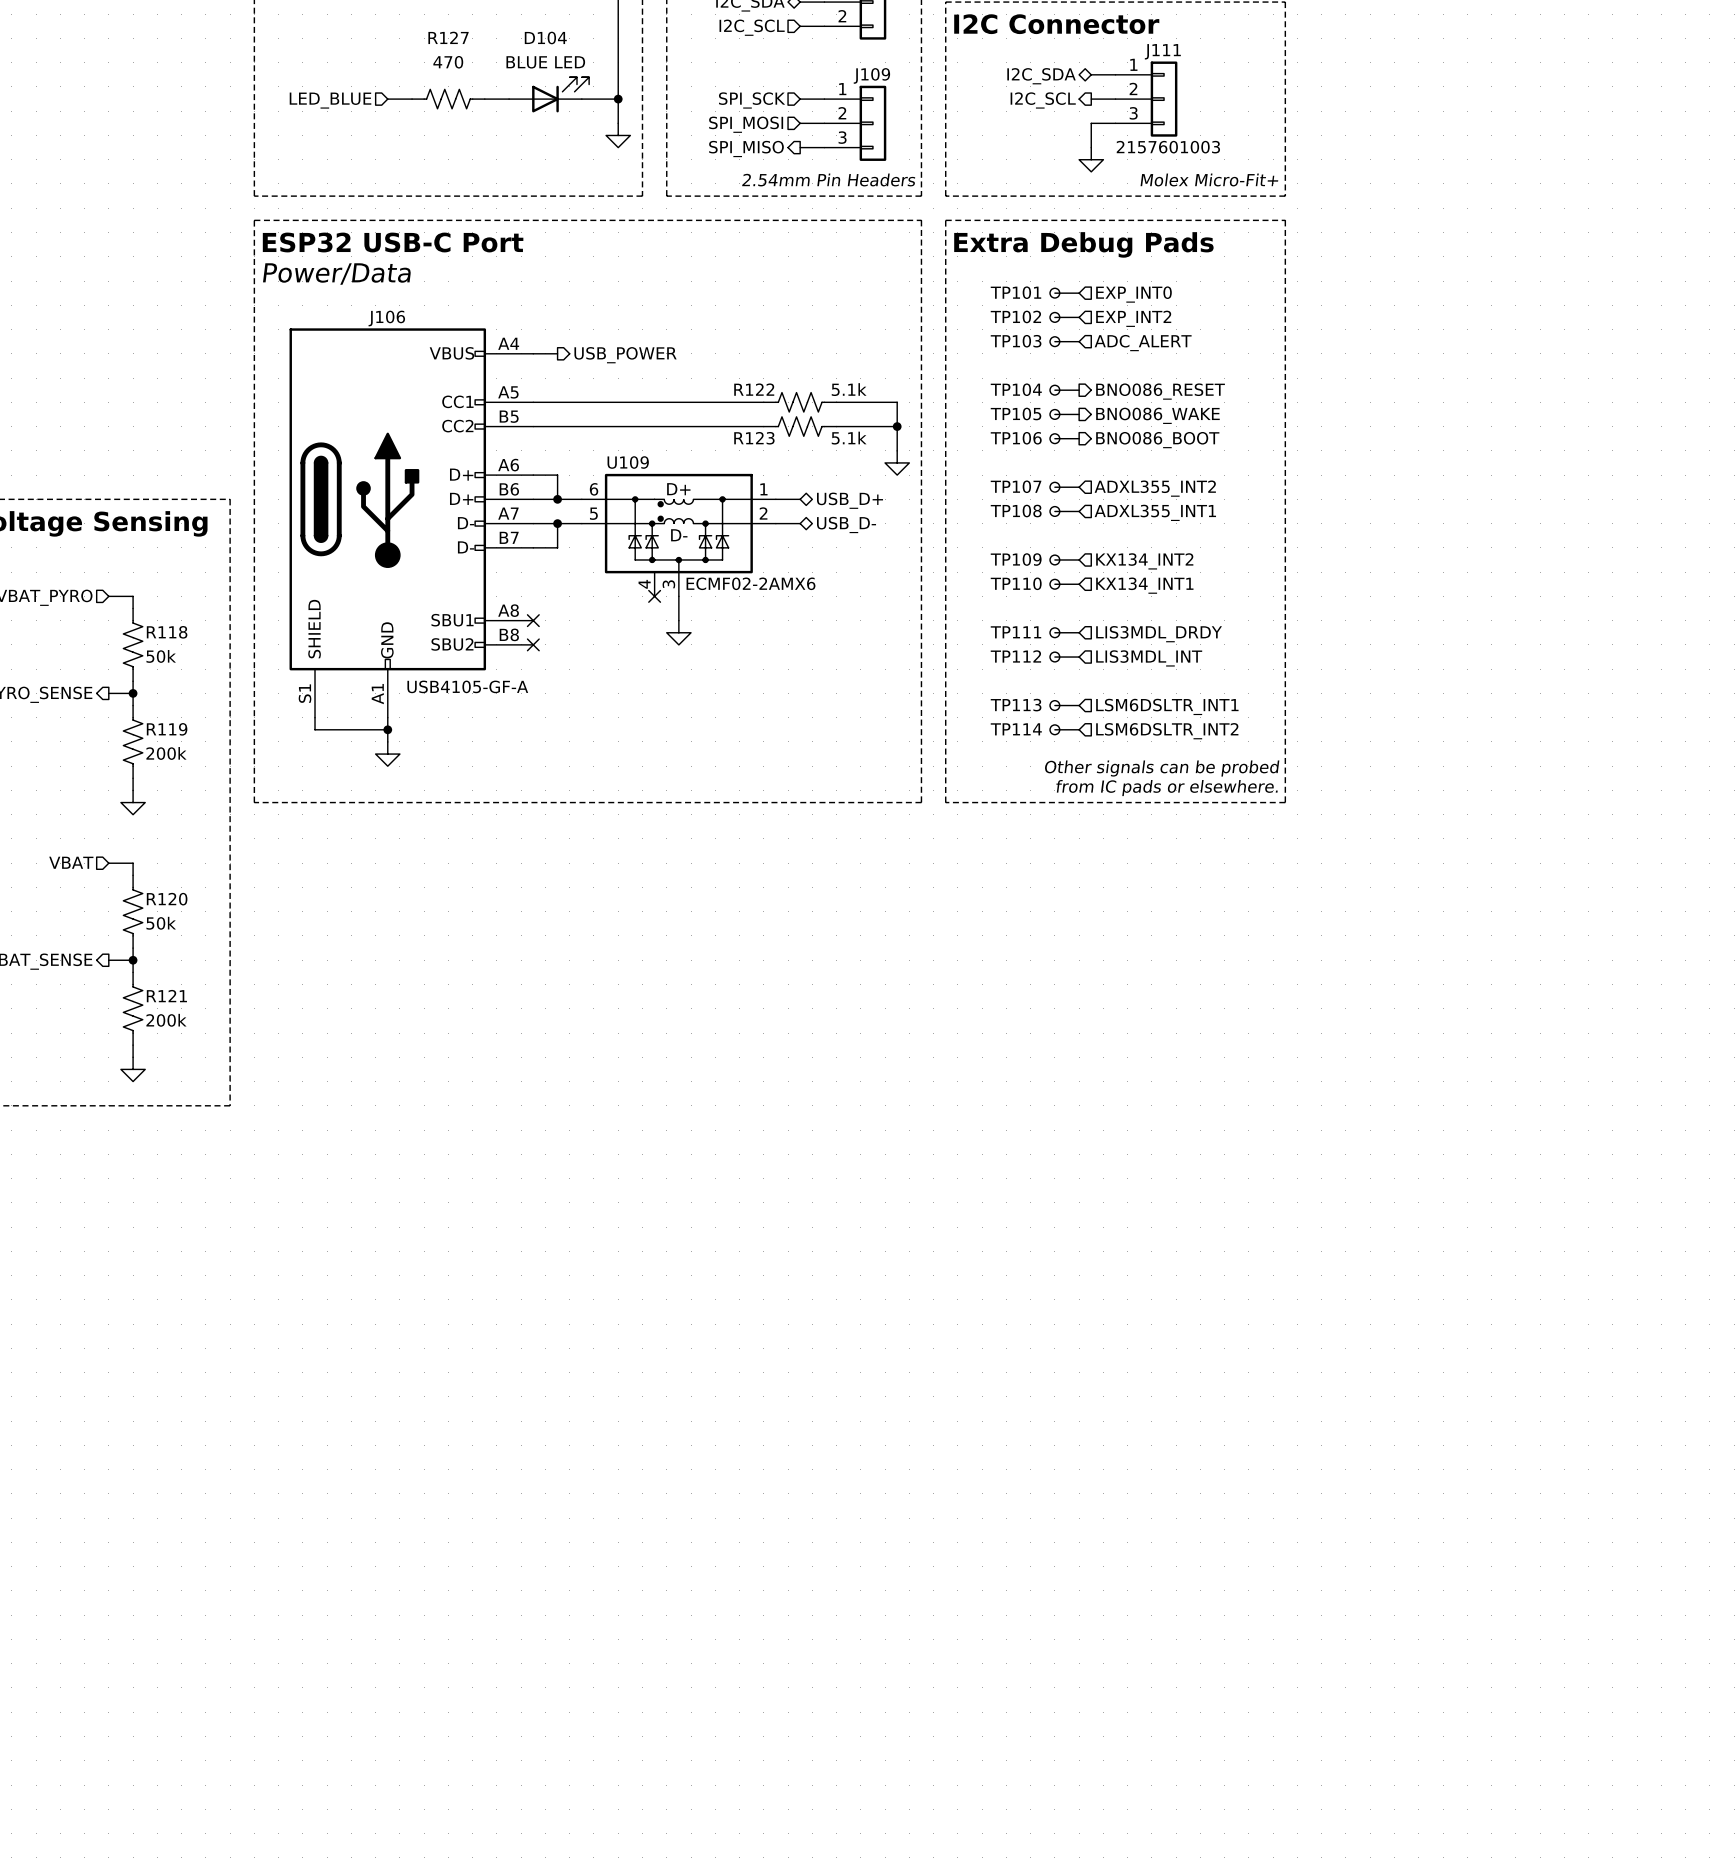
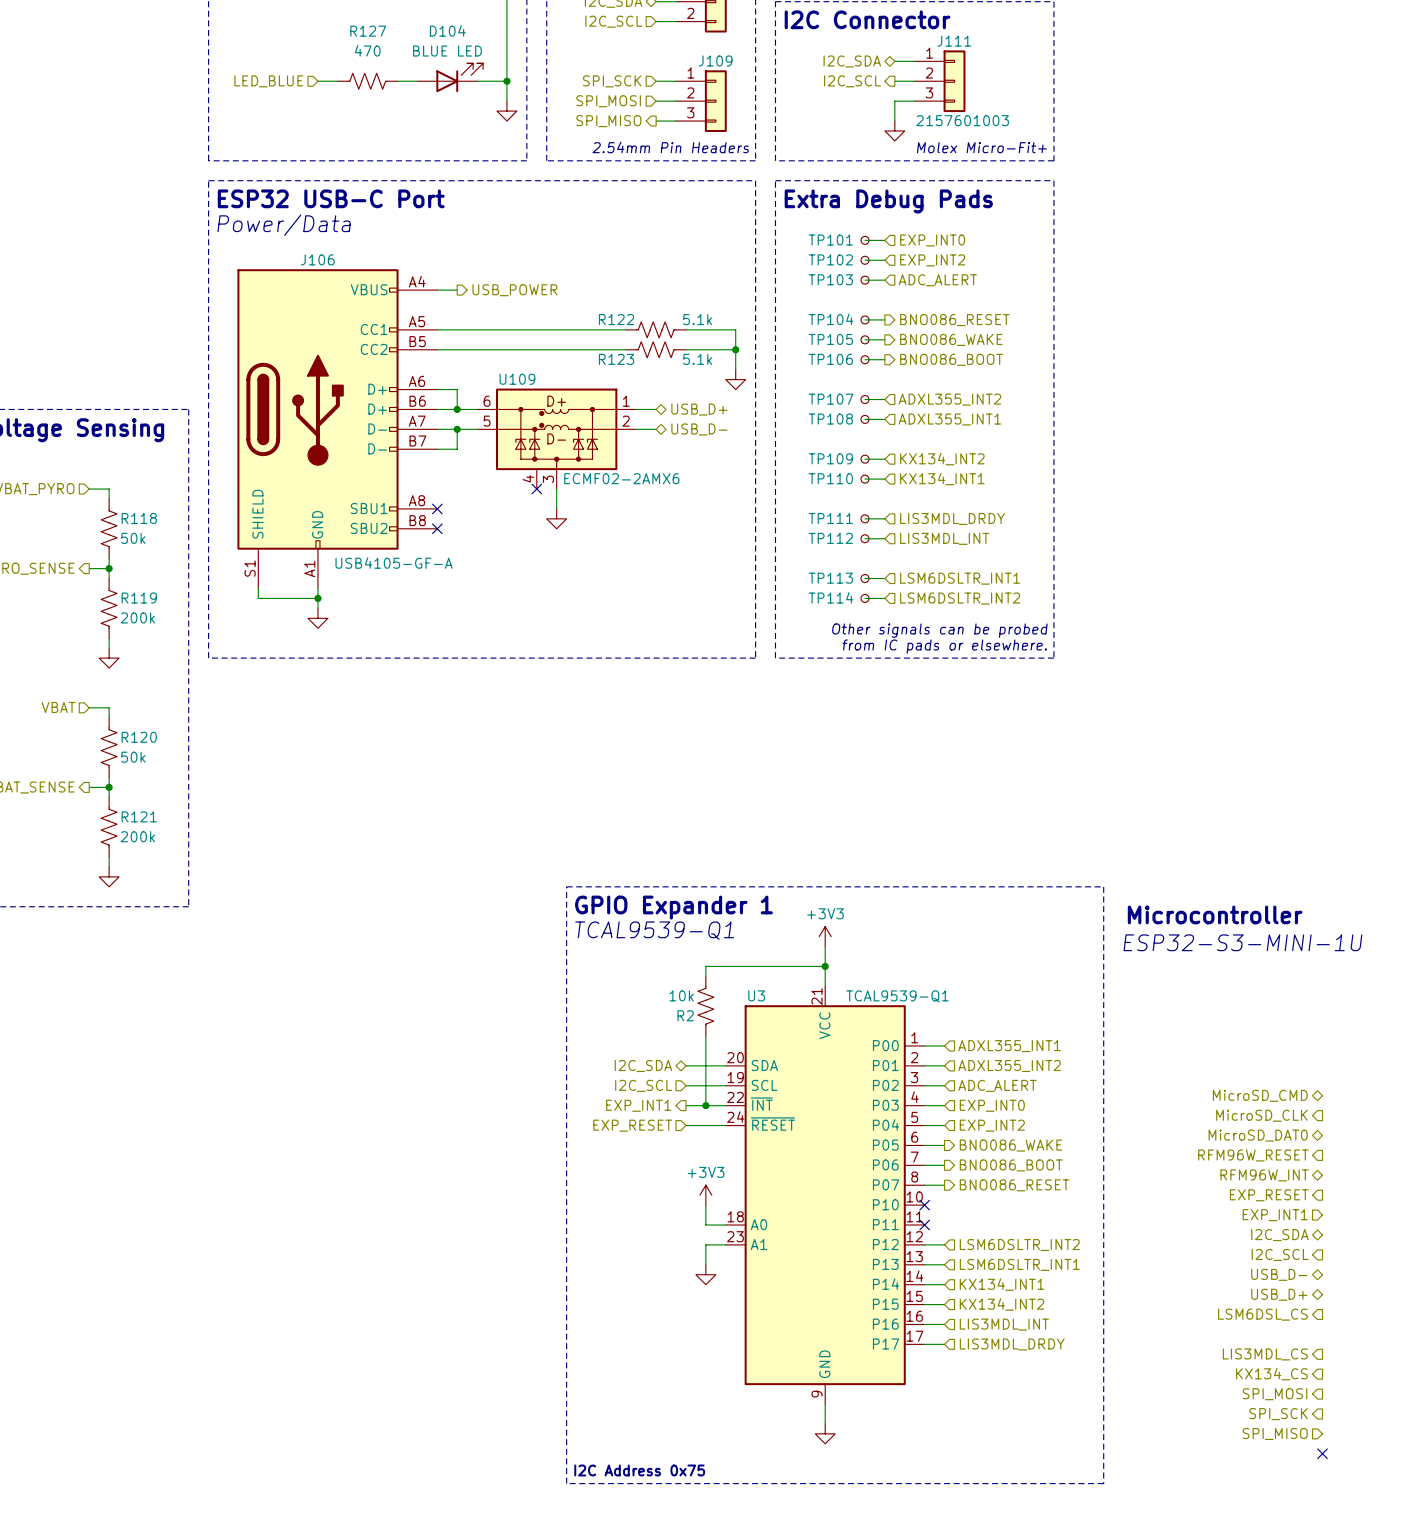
line: none -> (566, 886) (1103, 886) (1103, 1483) (566, 1483) (566, 886)
text: none -> GPIO Expander 1 (673, 907)
text: none -> Microcontroller (1215, 914)
text: none -> TCAL9539-Q1 (654, 930)
power symbol: none -> +3V3 (825, 936)
text: none -> ESP32-S3-MINI-1U (1242, 942)
wire: none -> (825, 946) (825, 986)
wire: none -> (825, 966) (705, 966) (705, 976)
junction: none -> (825, 966)
R2: none -> 10k (705, 1006)
wire: none -> (705, 1036) (705, 1105)
wire: none -> (924, 1045) (944, 1045)
hierarchical label: none -> ADXL355_INT1 (1009, 1046)
wire: none -> (685, 1065) (725, 1065)
wire: none -> (924, 1065) (944, 1065)
hierarchical label: none -> I2C_SDA (643, 1065)
hierarchical label: none -> ADXL355_INT2 (1009, 1065)
wire: none -> (685, 1085) (725, 1085)
wire: none -> (924, 1085) (944, 1085)
hierarchical label: none -> I2C_SCL (643, 1085)
hierarchical label: none -> ADC_ALERT (997, 1085)
hierarchical label: none -> MicroSD_CMD (1260, 1095)
wire: none -> (685, 1105) (725, 1105)
junction: none -> (705, 1105)
wire: none -> (924, 1105) (944, 1105)
hierarchical label: none -> EXP_INT1 (638, 1105)
hierarchical label: none -> EXP_INT0 (992, 1105)
hierarchical label: none -> MicroSD_CLK (1261, 1115)
wire: none -> (685, 1125) (725, 1125)
wire: none -> (924, 1125) (944, 1125)
hierarchical label: none -> EXP_RESET (632, 1125)
hierarchical label: none -> EXP_INT2 (992, 1125)
hierarchical label: none -> MicroSD_DAT0 (1258, 1135)
wire: none -> (924, 1145) (944, 1145)
hierarchical label: none -> BNO086_WAKE (1011, 1145)
hierarchical label: none -> RFM96W_RESET (1253, 1155)
wire: none -> (924, 1165) (944, 1165)
hierarchical label: none -> BNO086_BOOT (1011, 1165)
hierarchical label: none -> RFM96W_INT (1264, 1175)
wire: none -> (924, 1185) (944, 1185)
hierarchical label: none -> BNO086_RESET (1014, 1185)
power symbol: none -> +3V3 (705, 1195)
U3: none -> TCAL9539-Q1 (825, 1195)
hierarchical label: none -> EXP_RESET (1269, 1195)
wire: none -> (705, 1205) (705, 1225) (725, 1225)
no-connect mark: none -> (924, 1205)
hierarchical label: none -> EXP_INT1 (1275, 1215)
no-connect mark: none -> (924, 1225)
hierarchical label: none -> I2C_SDA (1279, 1235)
wire: none -> (725, 1244) (705, 1244) (705, 1264)
wire: none -> (924, 1244) (944, 1244)
hierarchical label: none -> LSM6DSLTR_INT2 (1019, 1245)
hierarchical label: none -> I2C_SCL (1280, 1254)
wire: none -> (924, 1264) (944, 1264)
hierarchical label: none -> LSM6DSLTR_INT1 (1019, 1264)
power symbol: none -> (705, 1274)
hierarchical label: none -> USB_D- (1279, 1274)
wire: none -> (924, 1284) (944, 1284)
hierarchical label: none -> KX134_INT1 (1002, 1284)
hierarchical label: none -> USB_D+ (1279, 1294)
wire: none -> (924, 1304) (944, 1304)
hierarchical label: none -> KX134_INT2 (1002, 1304)
hierarchical label: none -> LSM6DSL_CS (1262, 1314)
wire: none -> (924, 1324) (944, 1324)
hierarchical label: none -> LIS3MDL_INT (1004, 1324)
wire: none -> (924, 1344) (944, 1344)
hierarchical label: none -> LIS3MDL_DRDY (1012, 1344)
hierarchical label: none -> LIS3MDL_CS (1265, 1354)
hierarchical label: none -> KX134_CS (1271, 1374)
hierarchical label: none -> SPI_MOSI (1274, 1394)
wire: none -> (825, 1404) (825, 1423)
hierarchical label: none -> SPI_SCK (1278, 1414)
power symbol: none -> (825, 1433)
hierarchical label: none -> SPI_MISO (1275, 1433)
no-connect mark: none -> (1322, 1453)
text: none -> I2C Address 0x75 (639, 1470)

